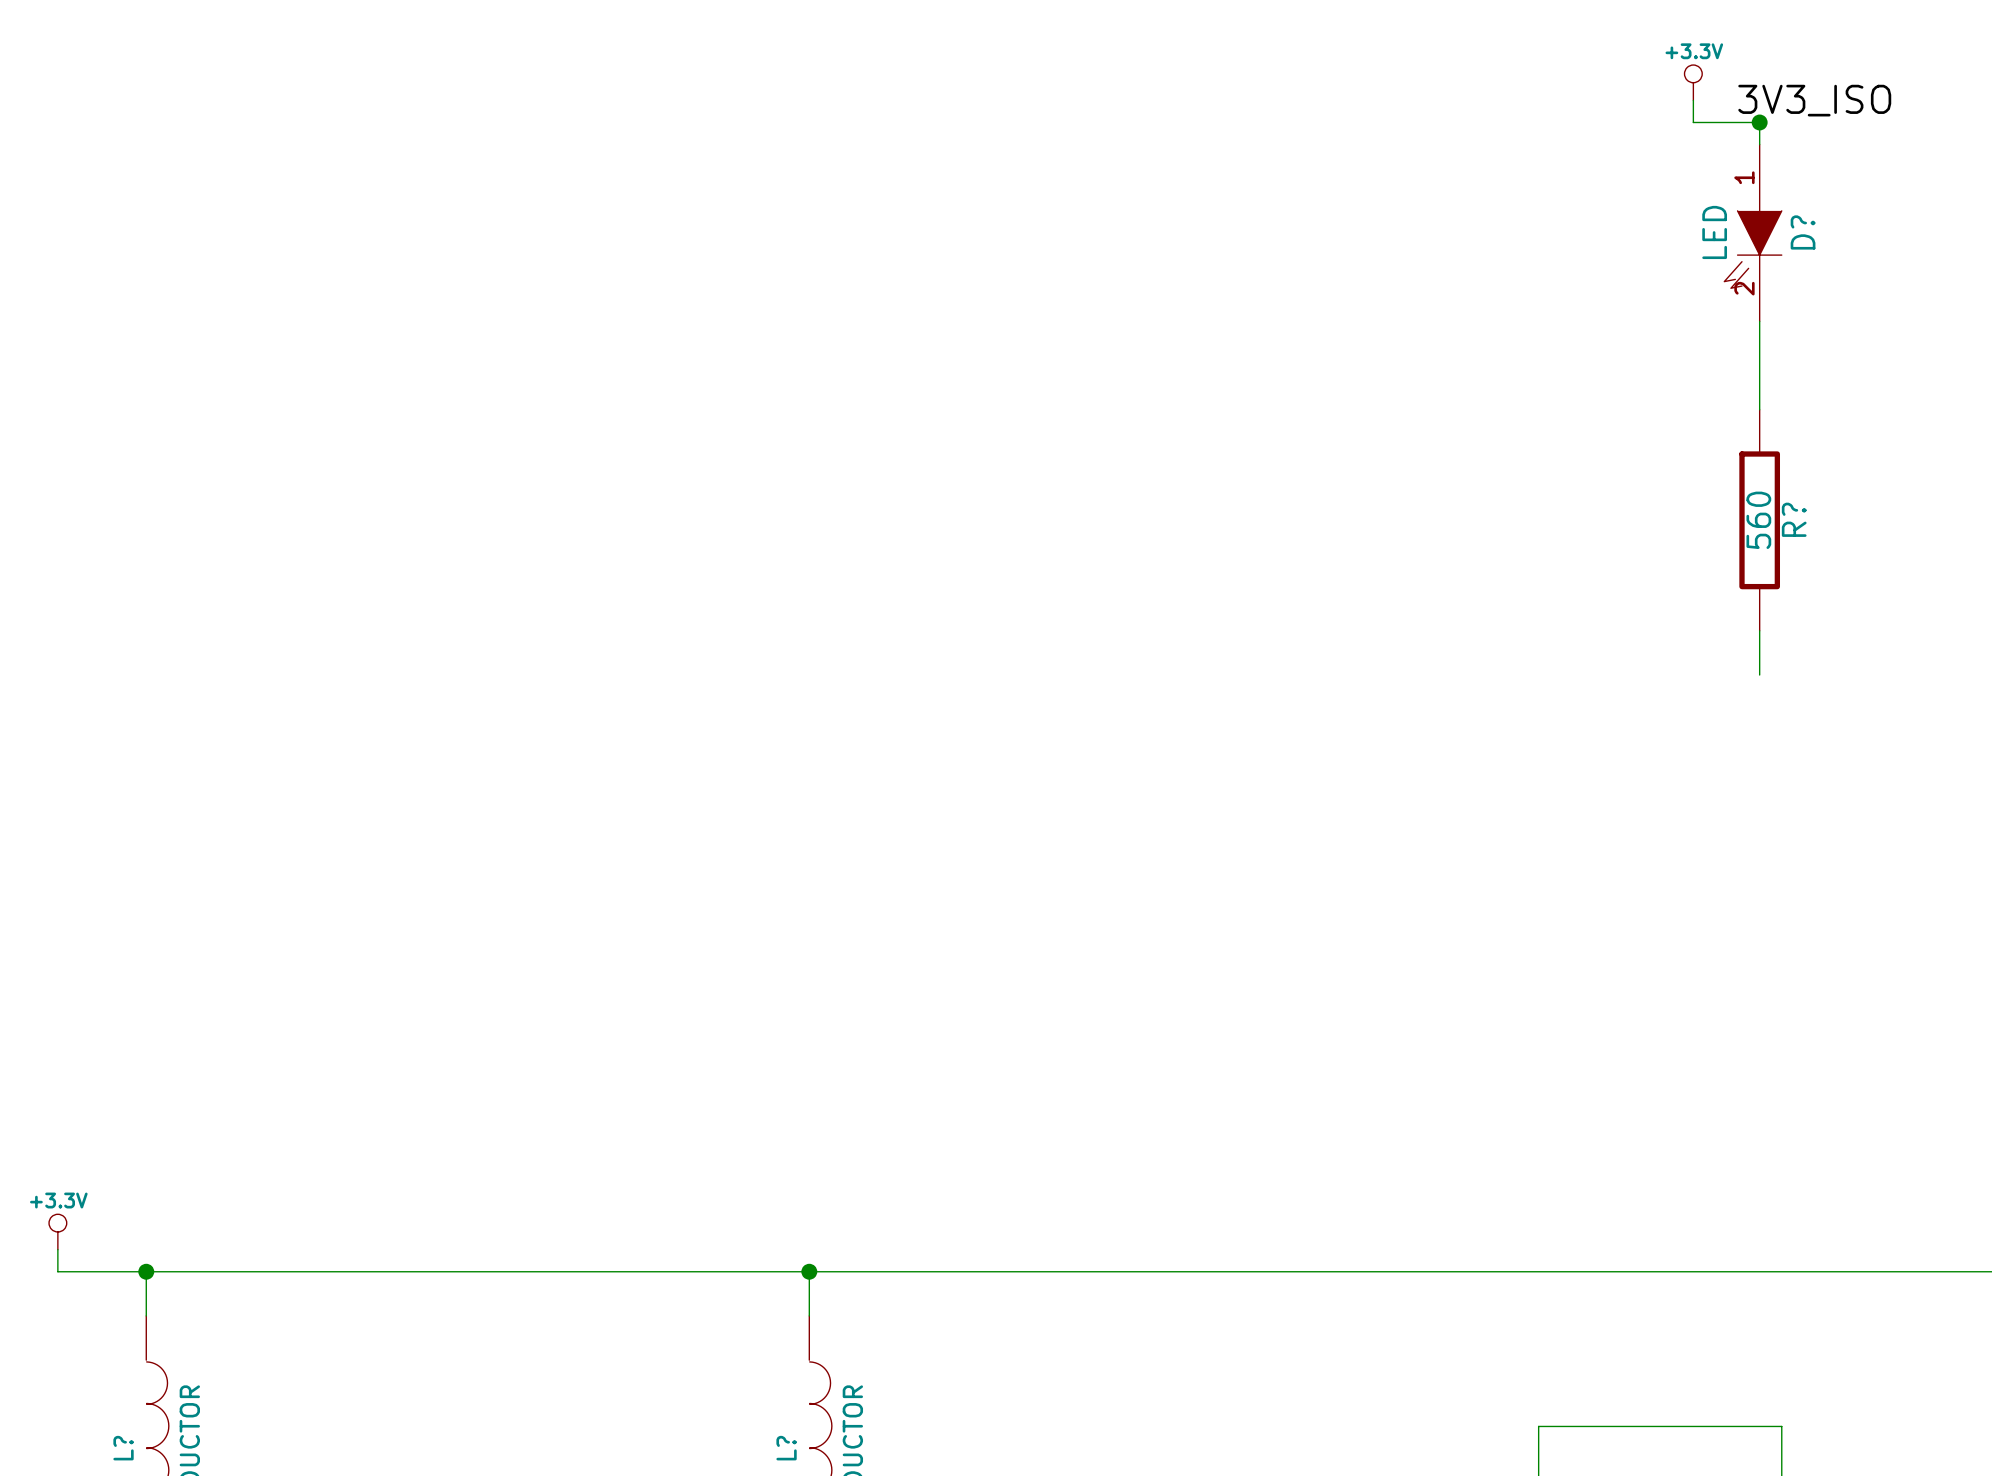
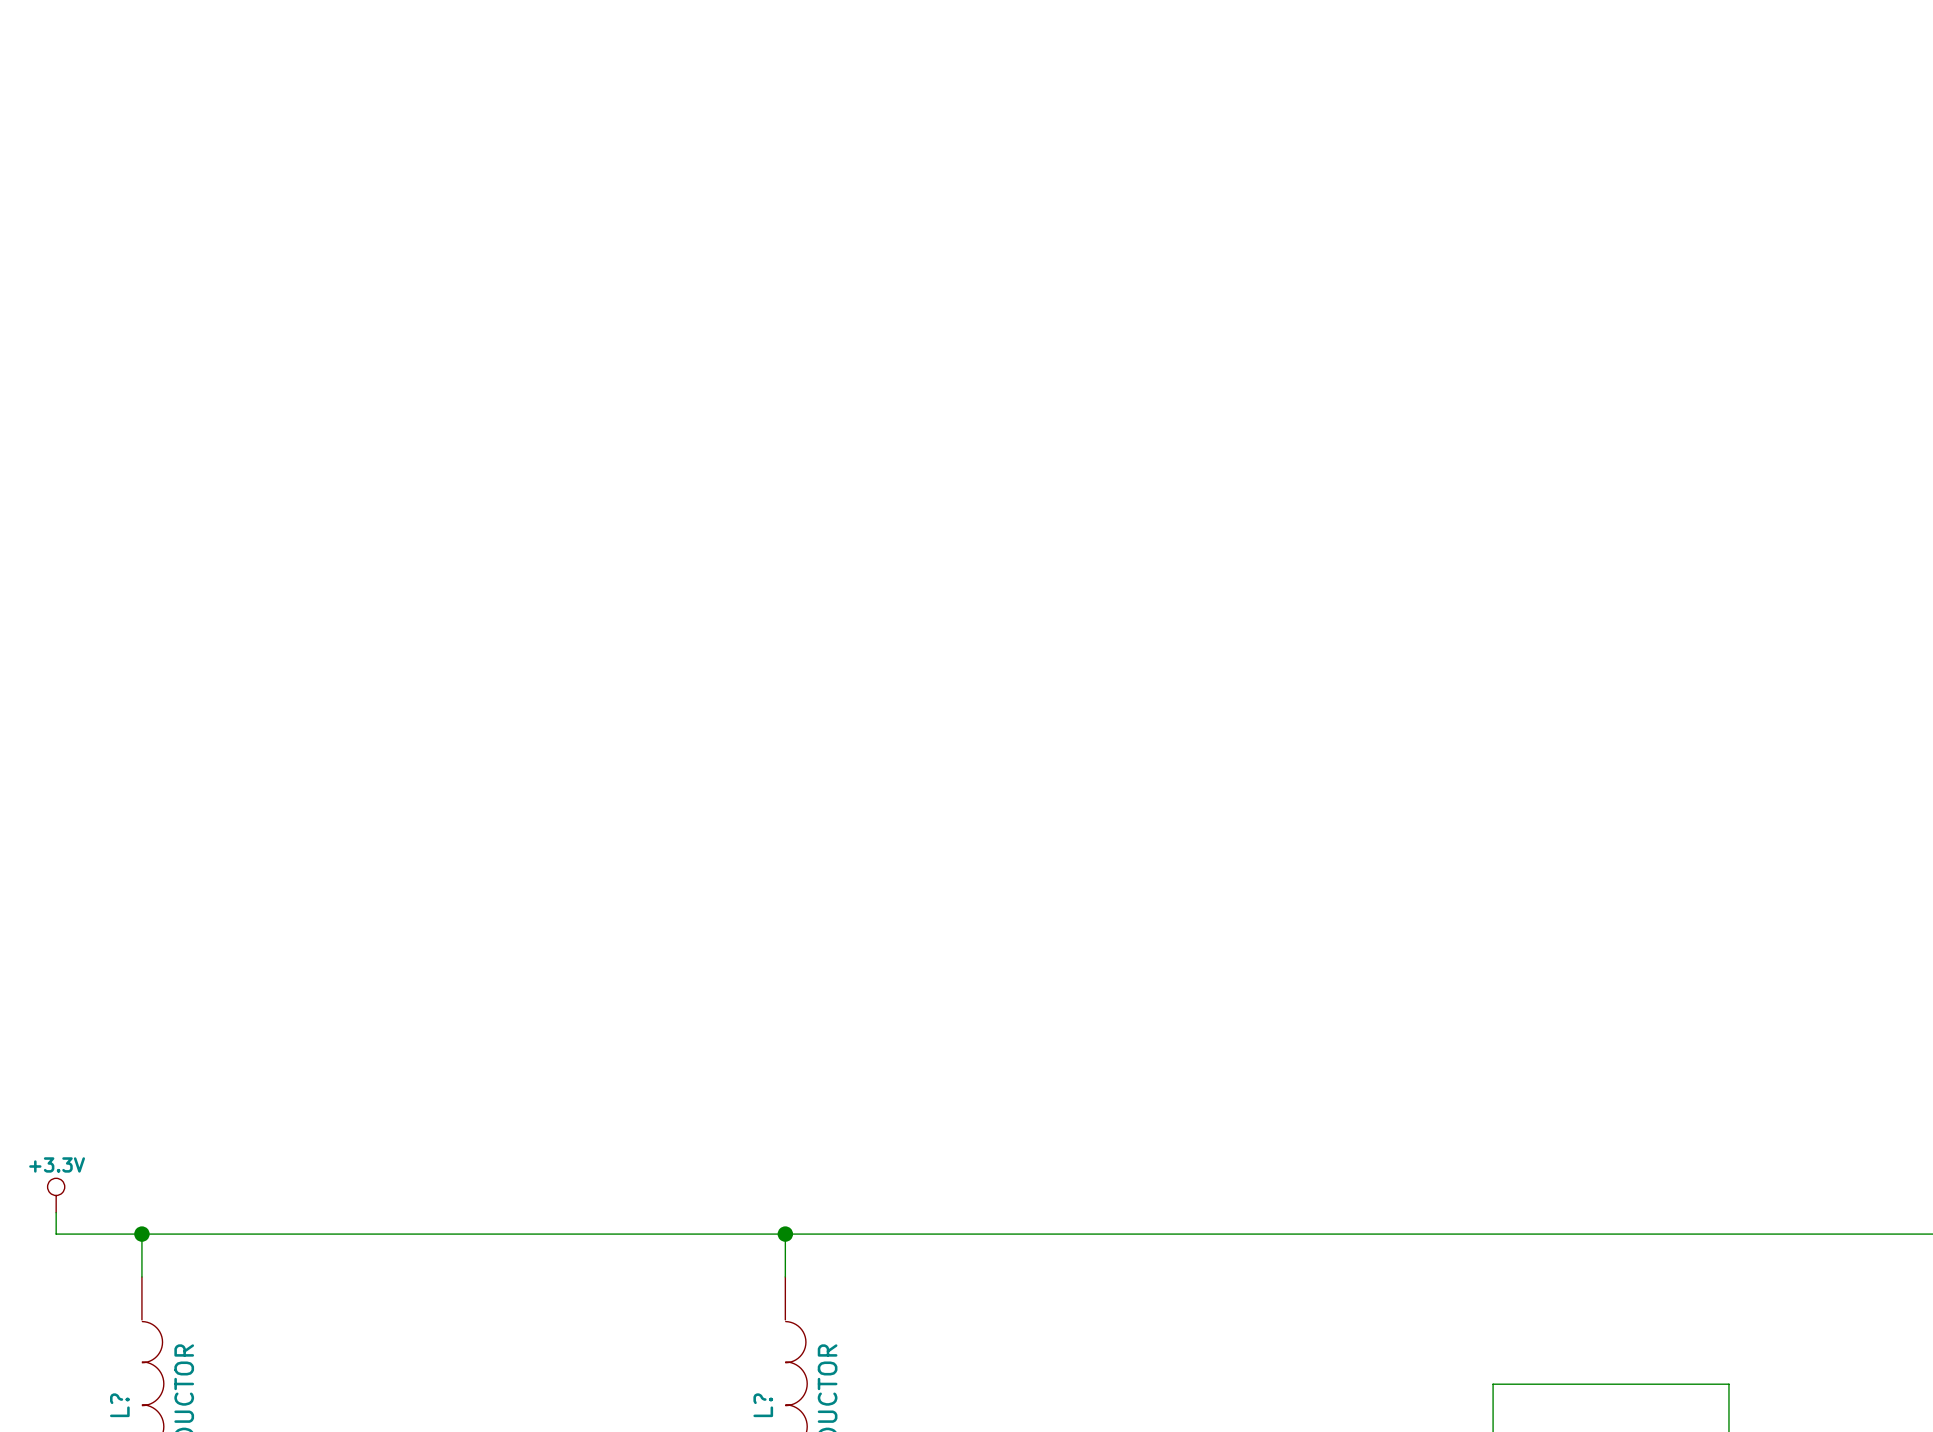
power symbol: +3.3V (1693, 82) -> none
wire: (1693, 100) (1693, 122) (1759, 122) (1759, 144) -> none
label: 3V3_ISO (1814, 100) -> none
junction: (1759, 122) -> none
D?: LED (1753, 232) -> none
wire: (1759, 321) (1759, 409) -> none
R?: 560 (1759, 520) -> none
wire: (1759, 630) (1759, 675) -> none

